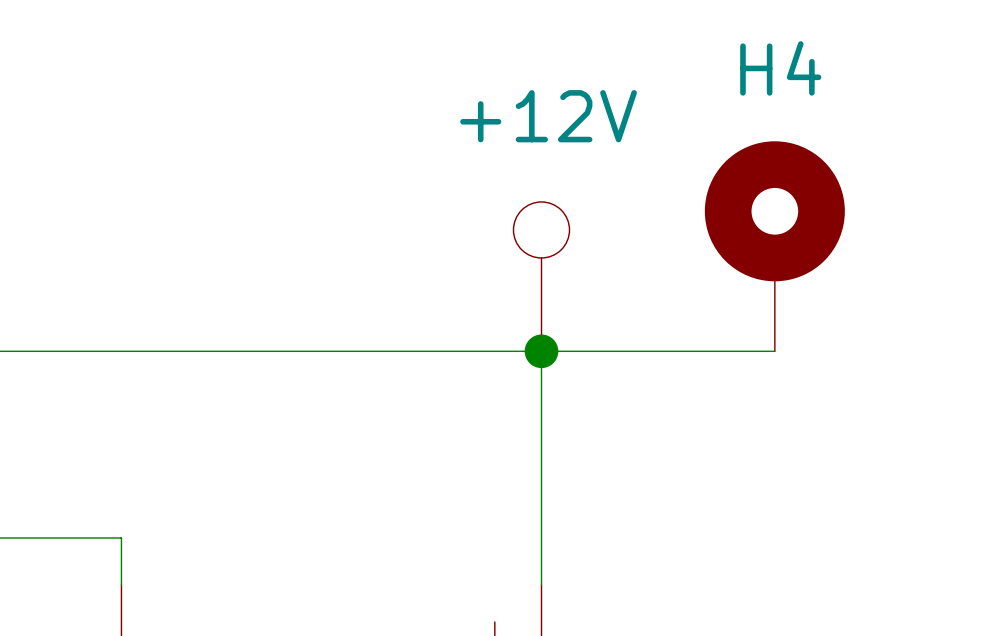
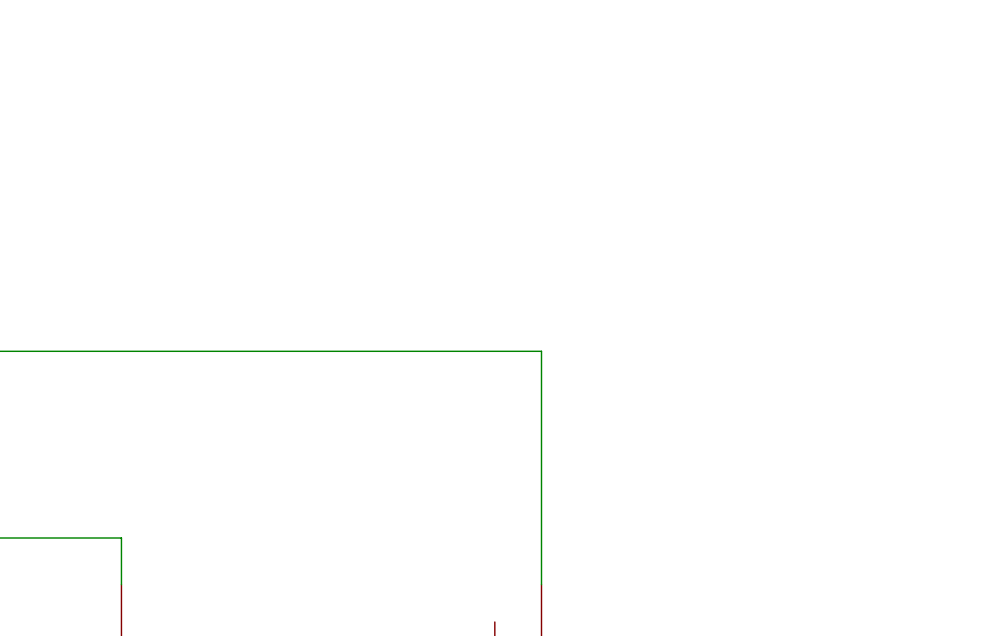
H4: (774, 246) -> none
part: +12V (541, 276) -> none
wire: (541, 351) (774, 351) -> none
junction: (541, 351) -> none

